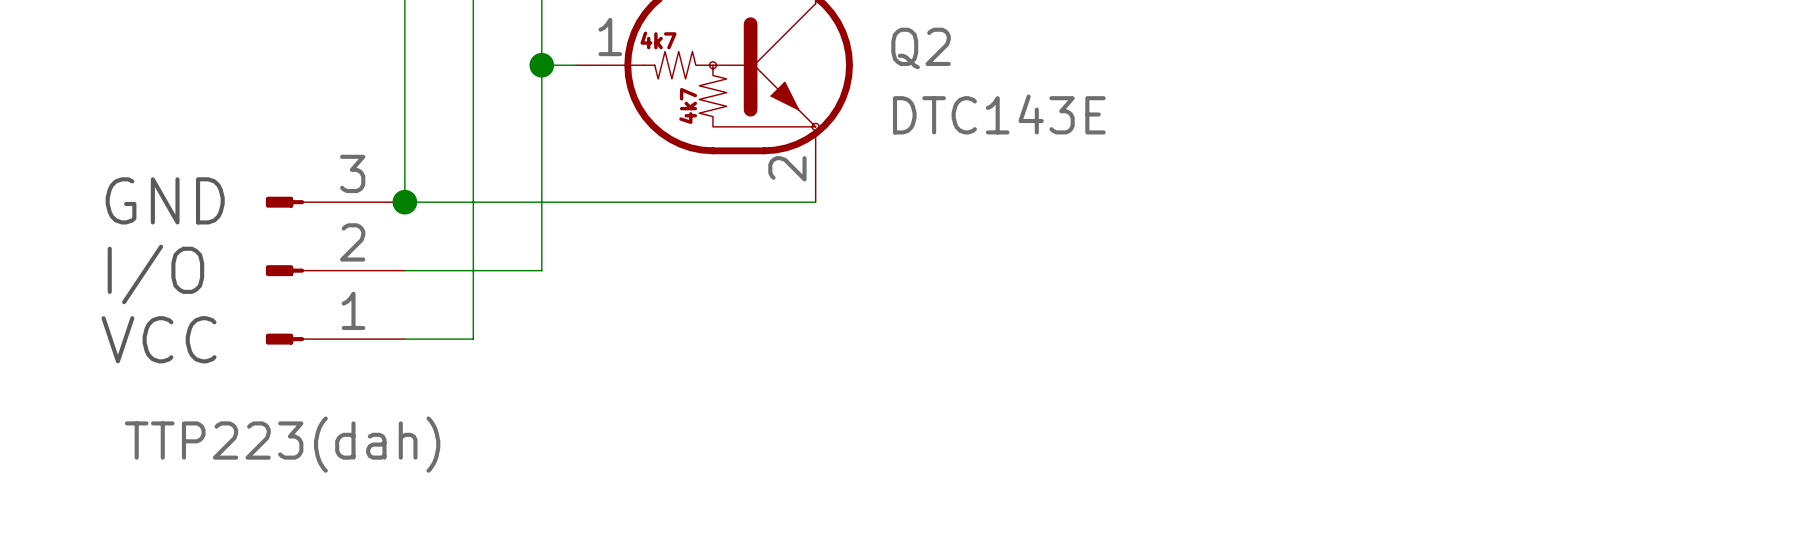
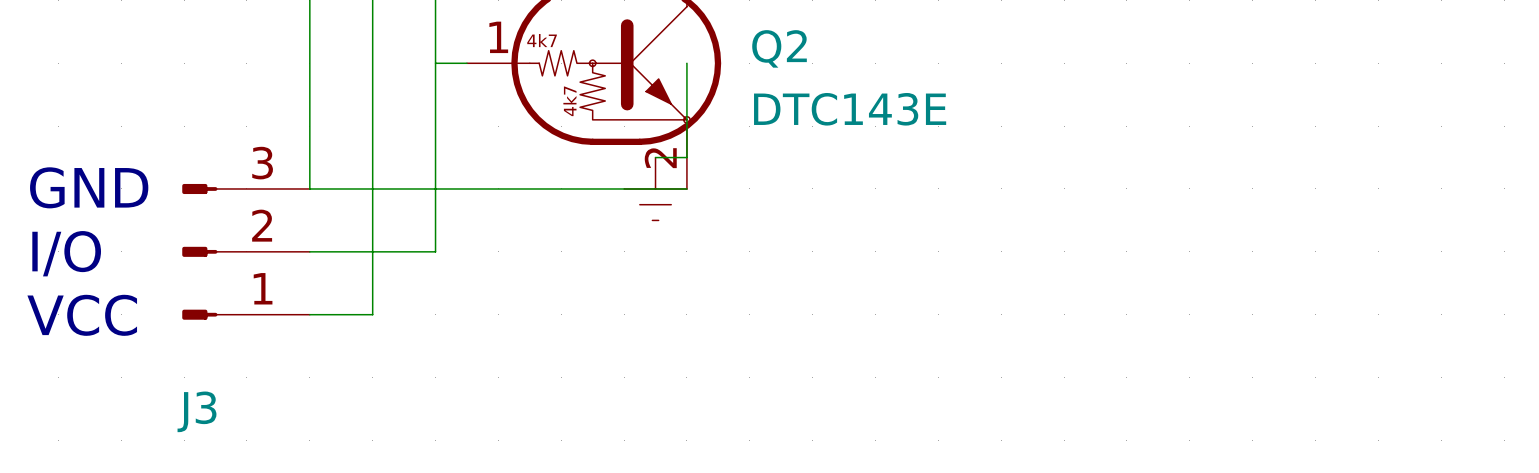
junction: (541, 65) -> none
wire: none -> (686, 63) (686, 157) (655, 157)
junction: (404, 202) -> none
power symbol: none -> (655, 188)
TTP223(dah) name: TTP223(dah) (282, 444) -> J3 (197, 411)

